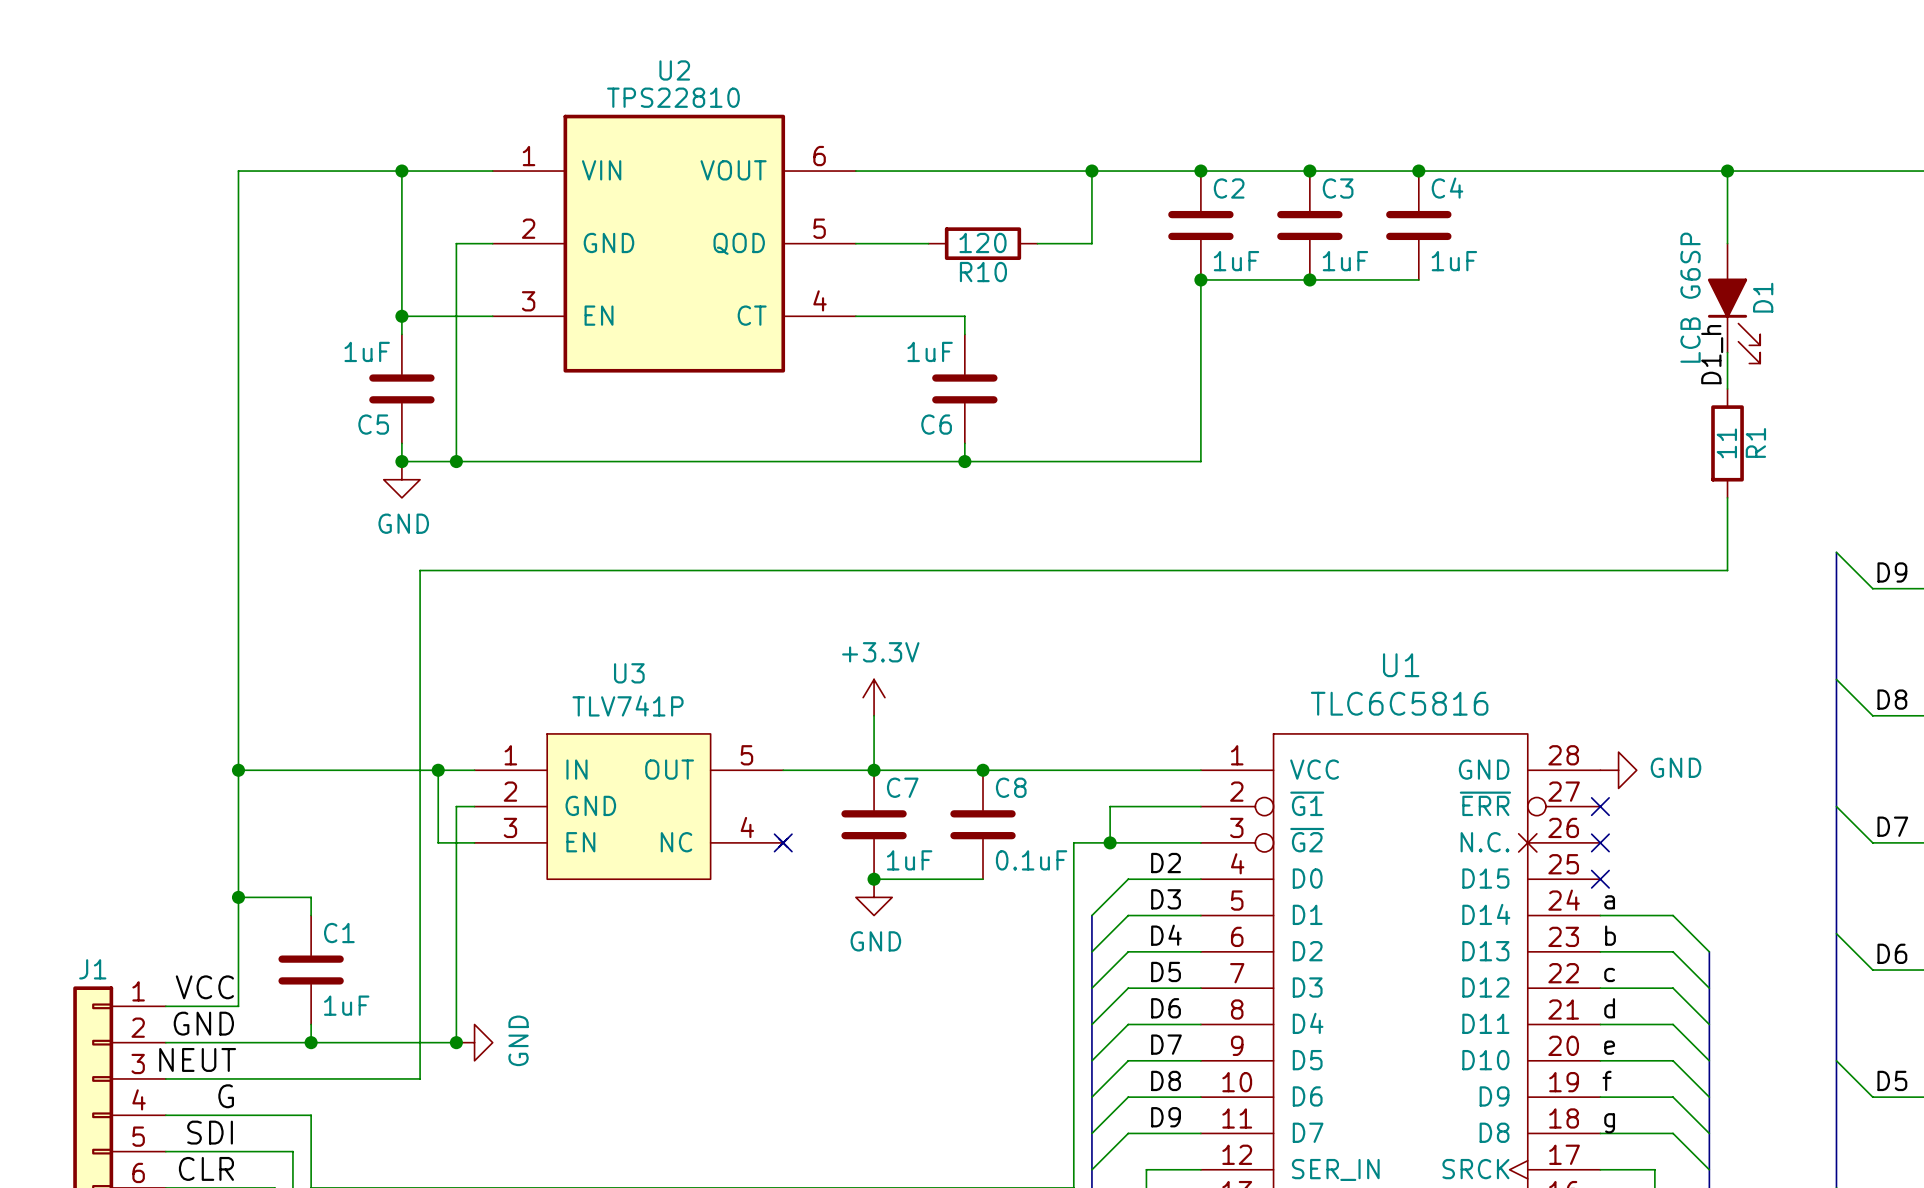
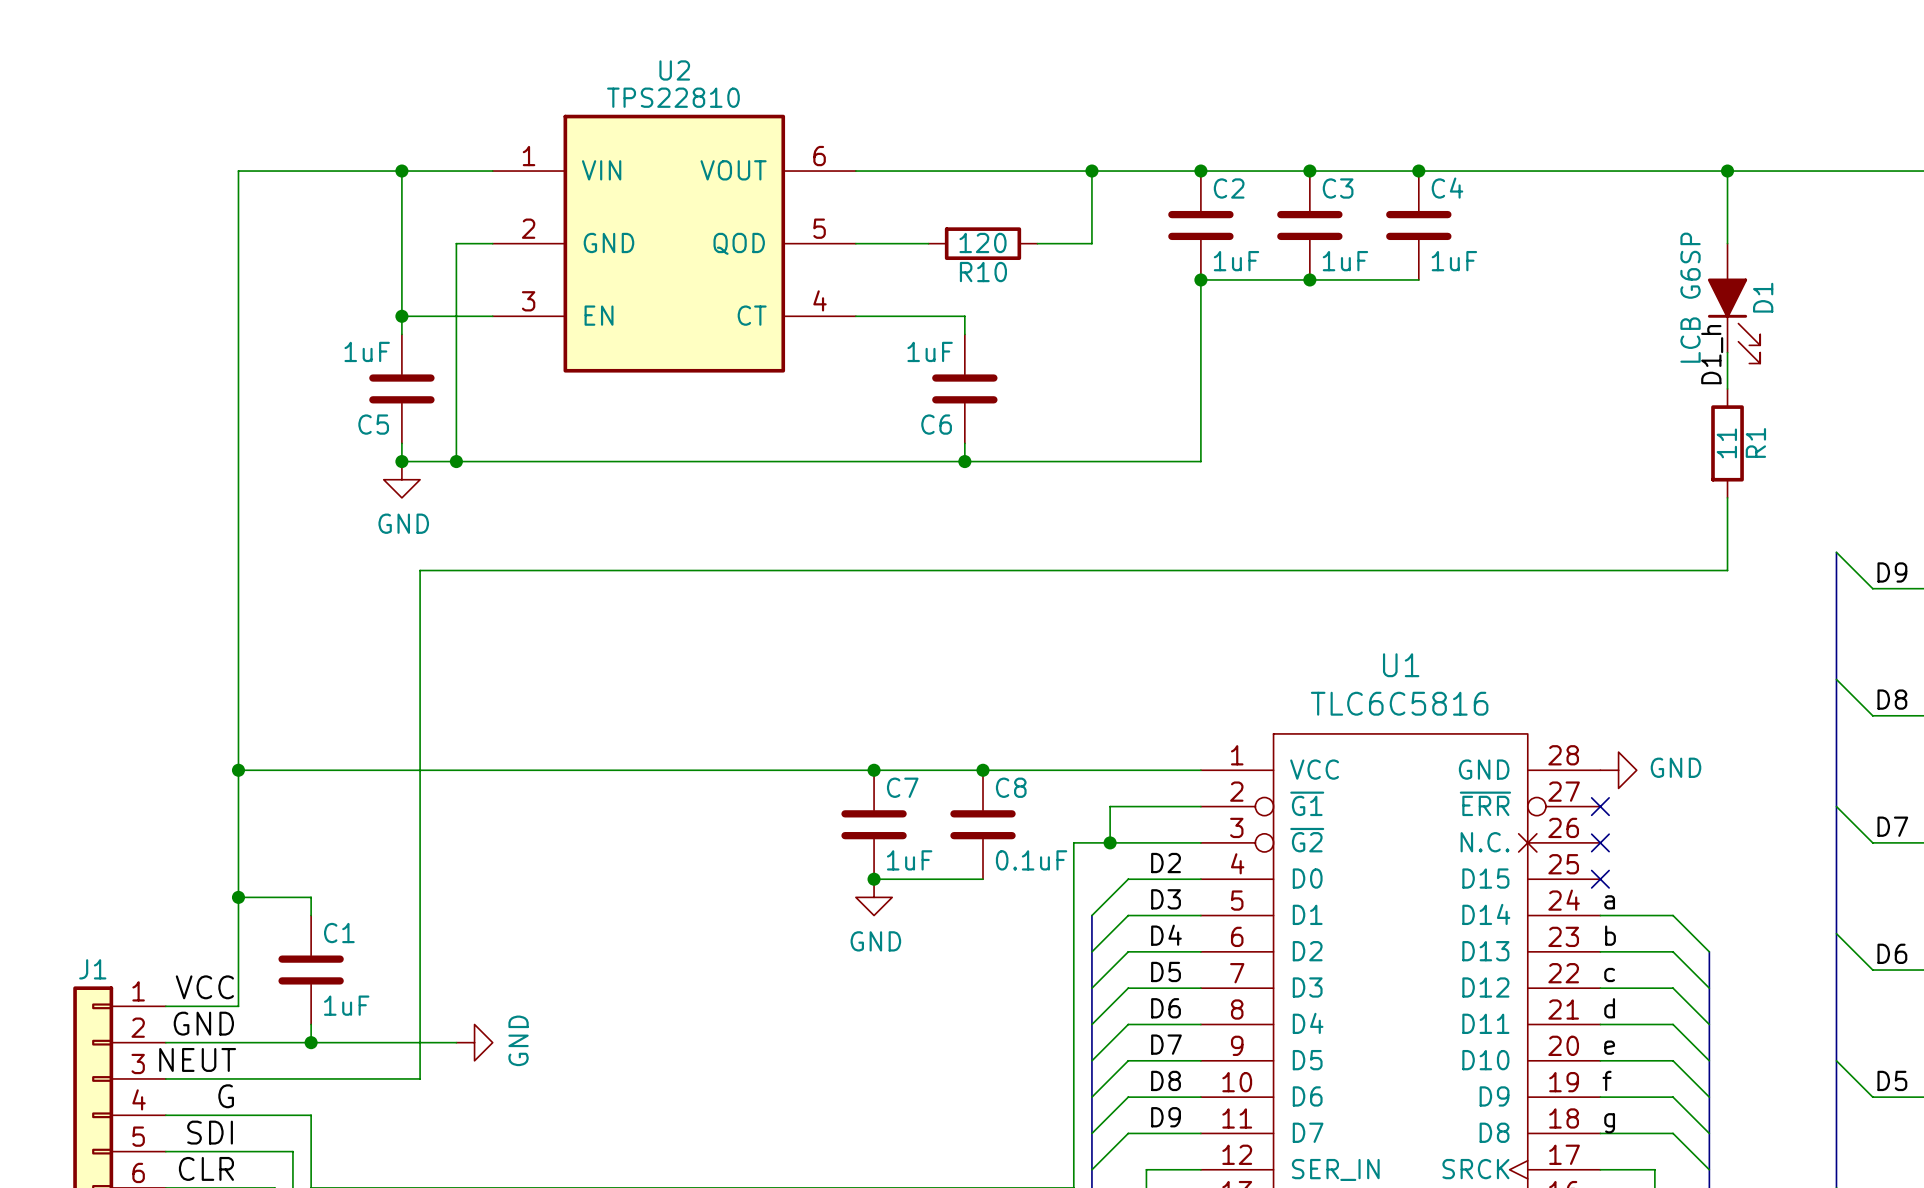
power symbol: +3.3V (874, 697) -> none
wire: (874, 715) (874, 770) -> none
wire: (438, 770) (438, 842) (474, 842) -> none
junction: (438, 770) -> none
wire: (474, 806) (456, 806) (456, 1042) -> none
U3: TLV741P (631, 806) -> none
no-connect mark: (783, 842) -> none
junction: (456, 1042) -> none

